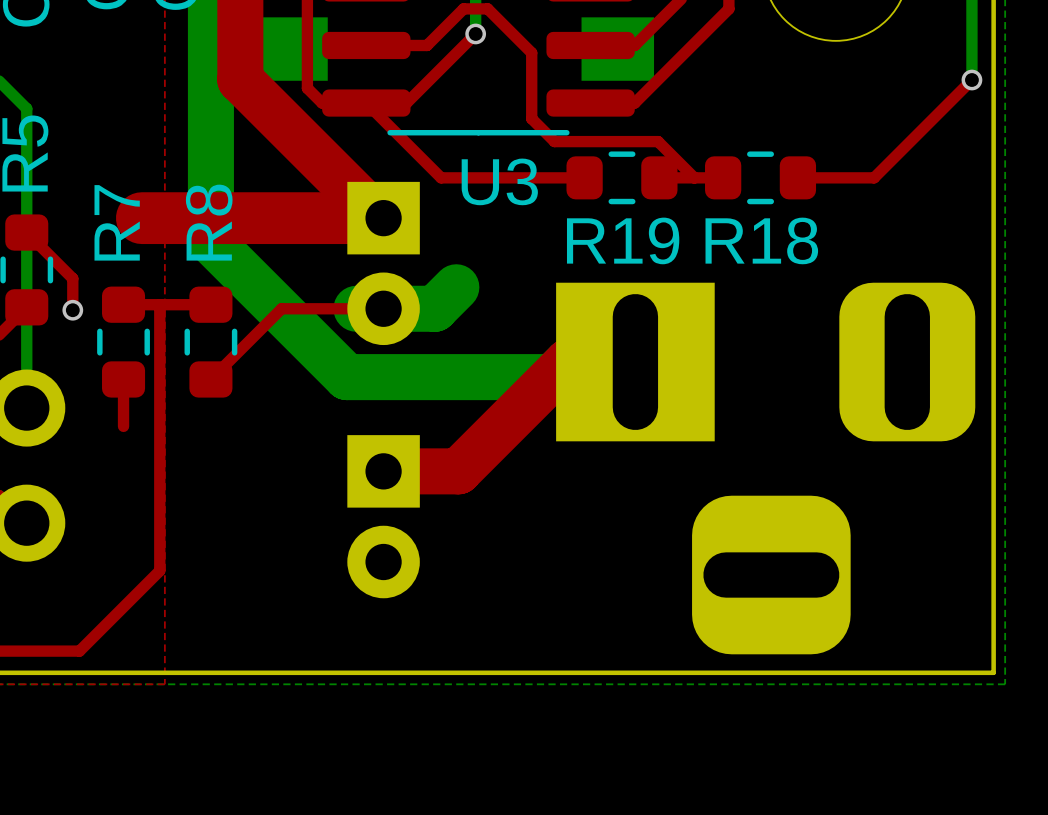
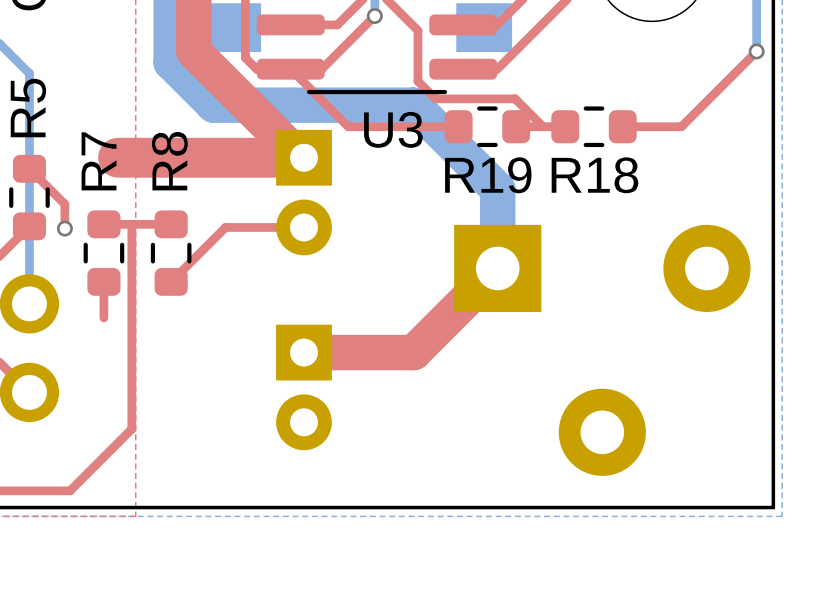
bottom track: (210, 94) (210, 241) (346, 377) (552, 377) (567, 362) -> (171, 62) (213, 105) (413, 105) (497, 189) (497, 268)
part footprint: [556, 282, 976, 655] -> [454, 224, 751, 476]
bottom track: (456, 287) (434, 308) (356, 308) -> none
top track: (597, 362) (567, 362) (458, 471) -> (497, 268) (413, 352) (361, 352)

